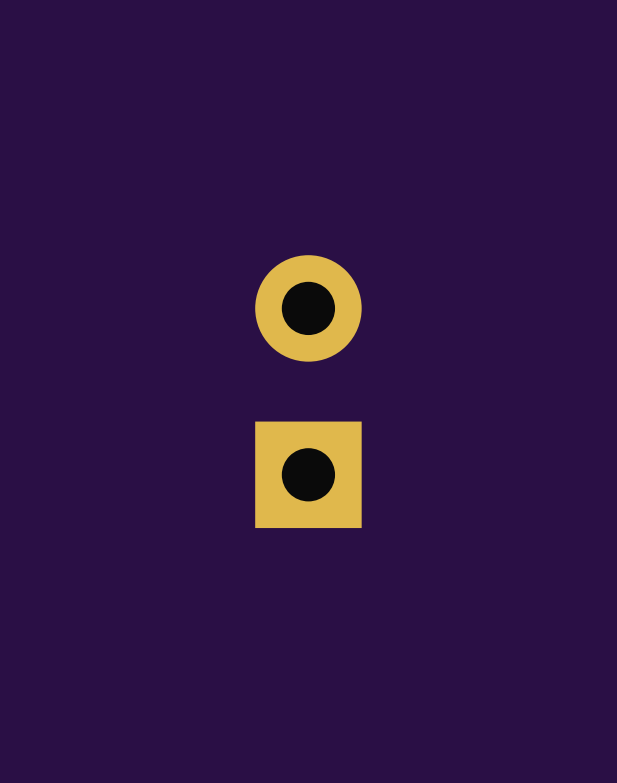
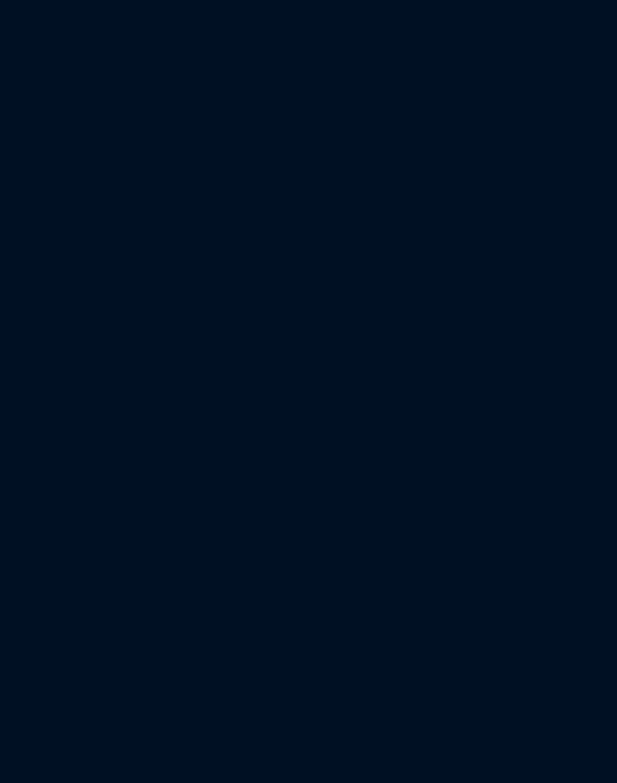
part: (308, 391) -> none

